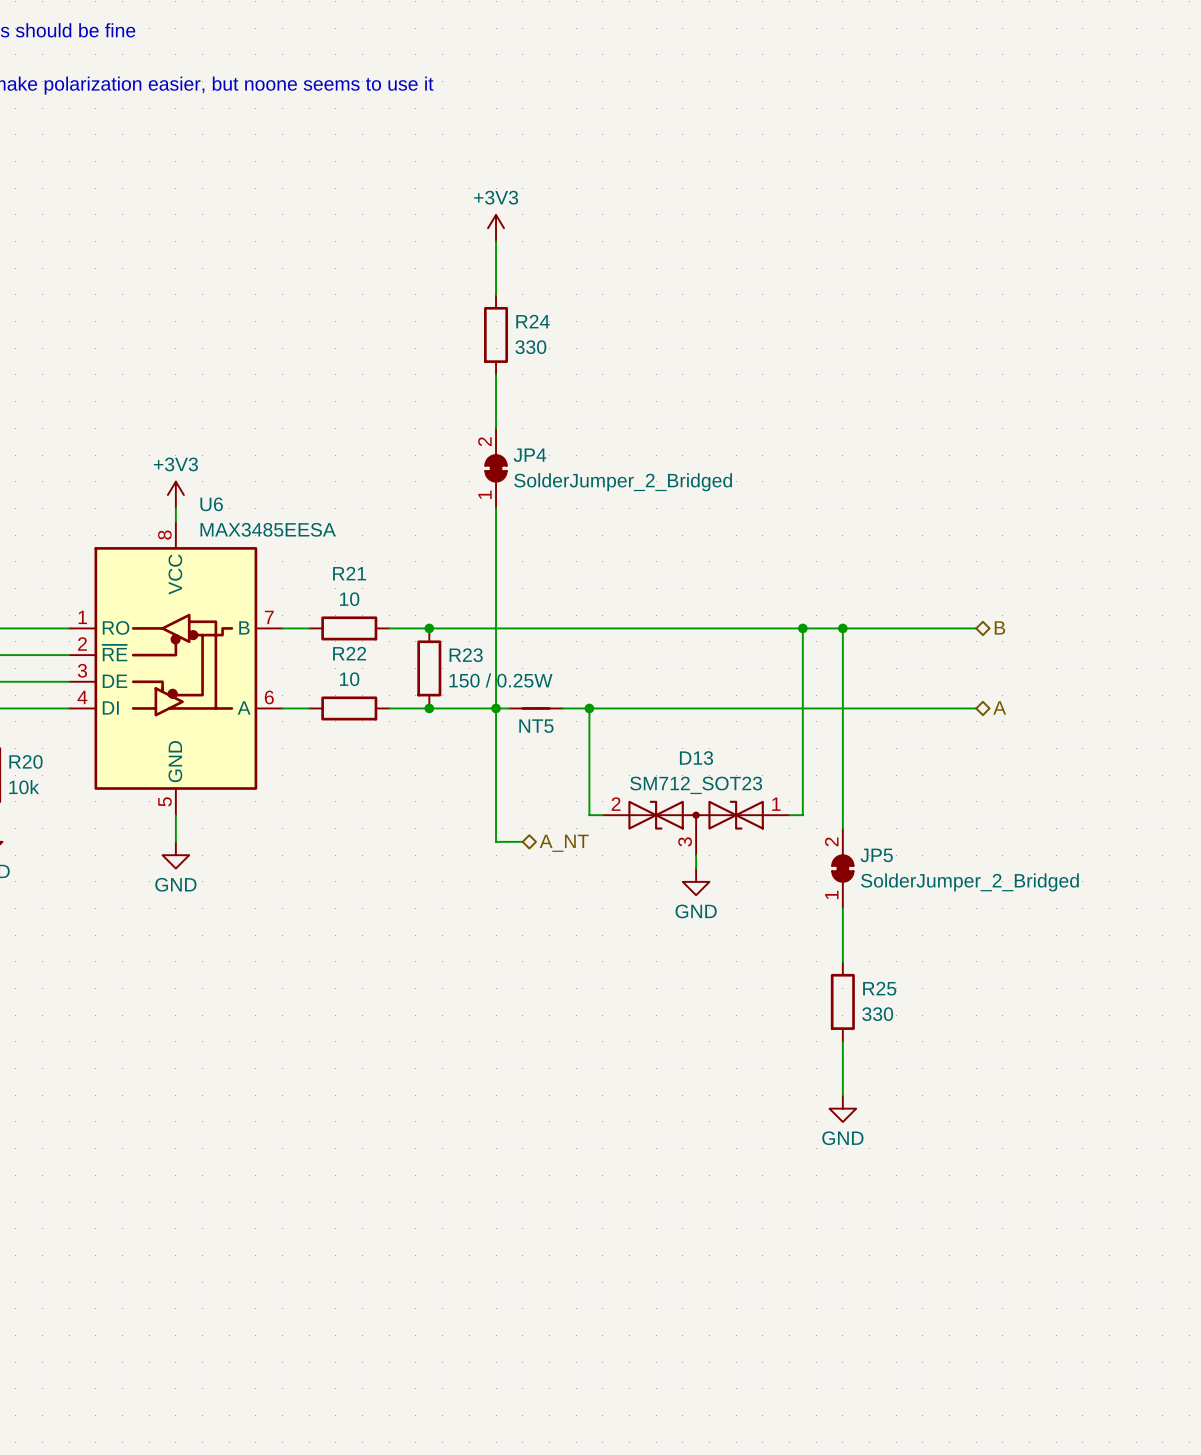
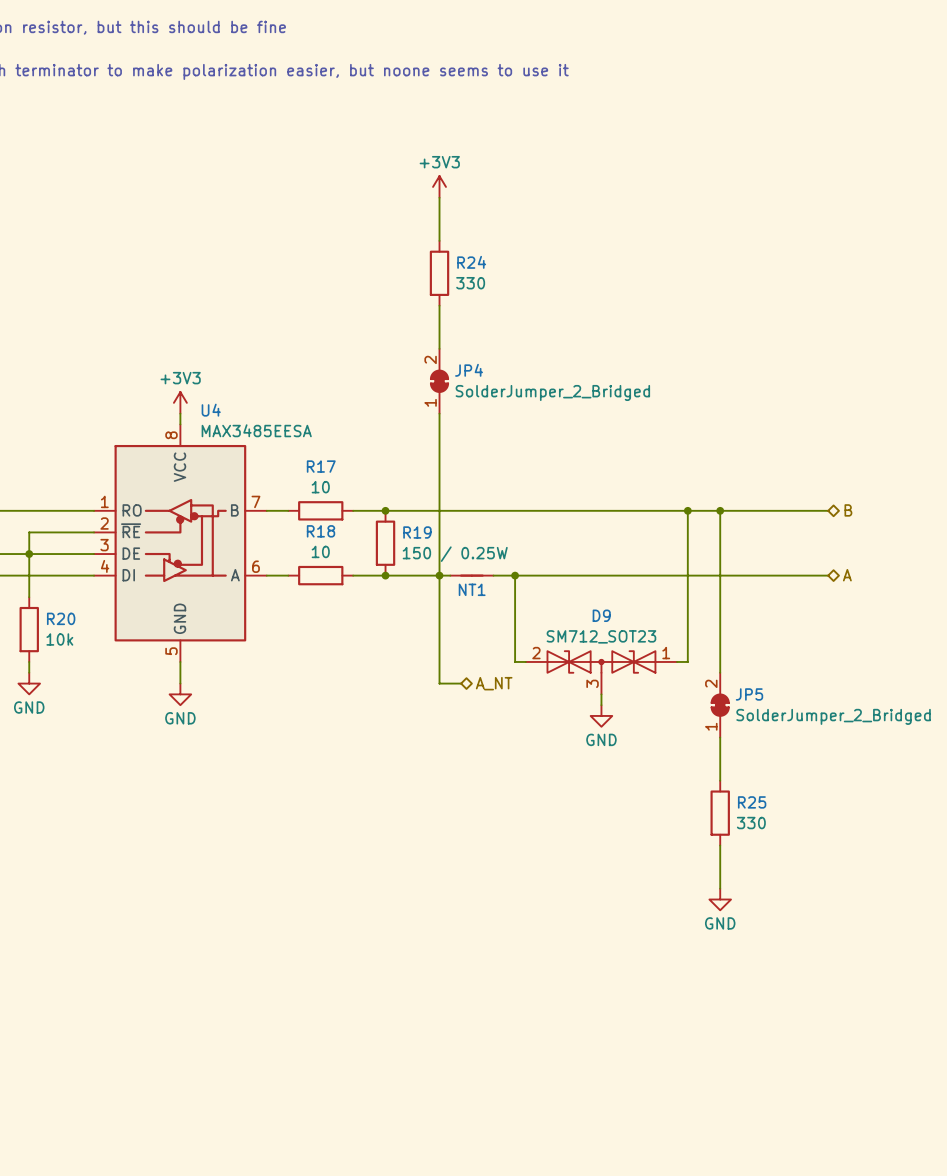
U6 name: U6 (211, 504) -> U4 (211, 410)
R21 name: R21 (349, 573) -> R17 (321, 466)
R22 name: R22 (349, 653) -> R18 (321, 531)
R23 name: R23 (466, 655) -> R19 (417, 532)
NT5 name: NT5 (536, 726) -> NT1 (472, 589)
D13 name: D13 (696, 758) -> D9 (601, 615)

